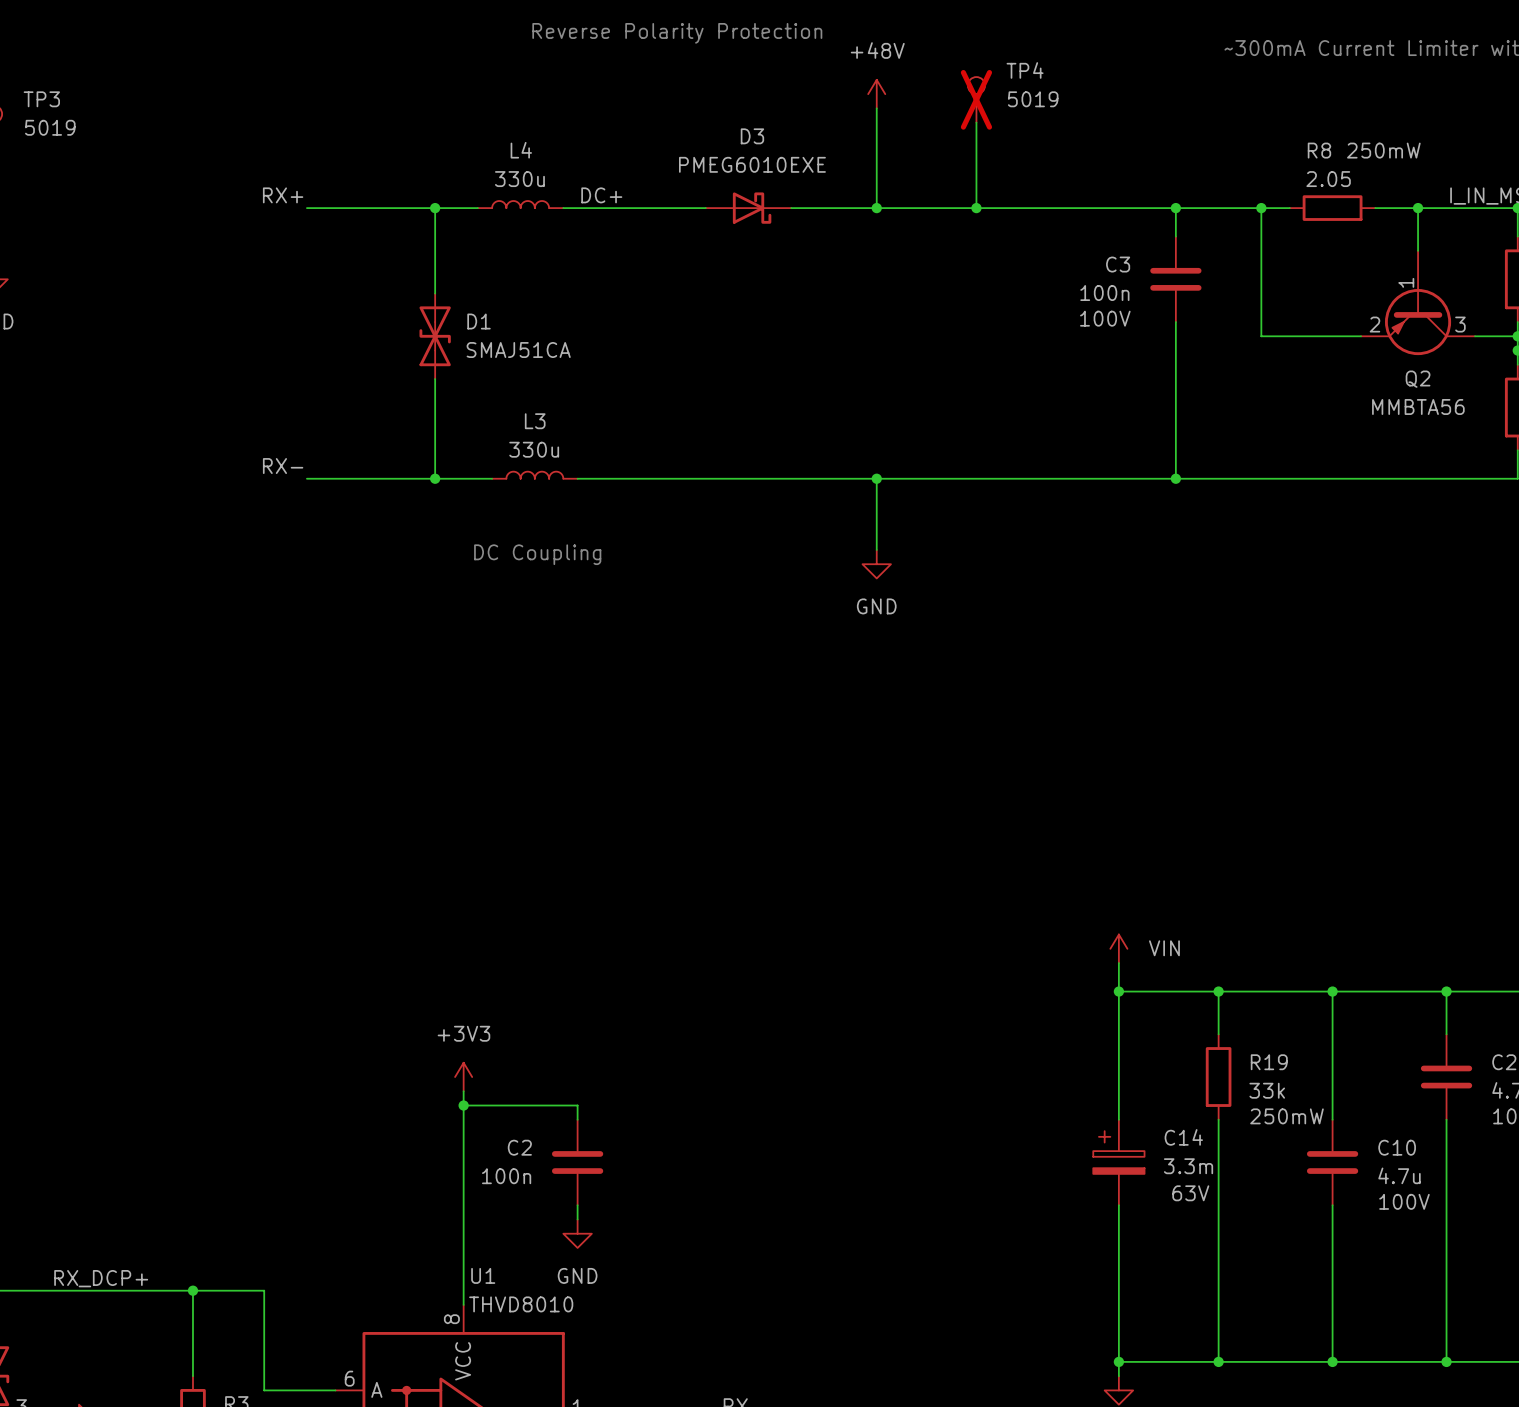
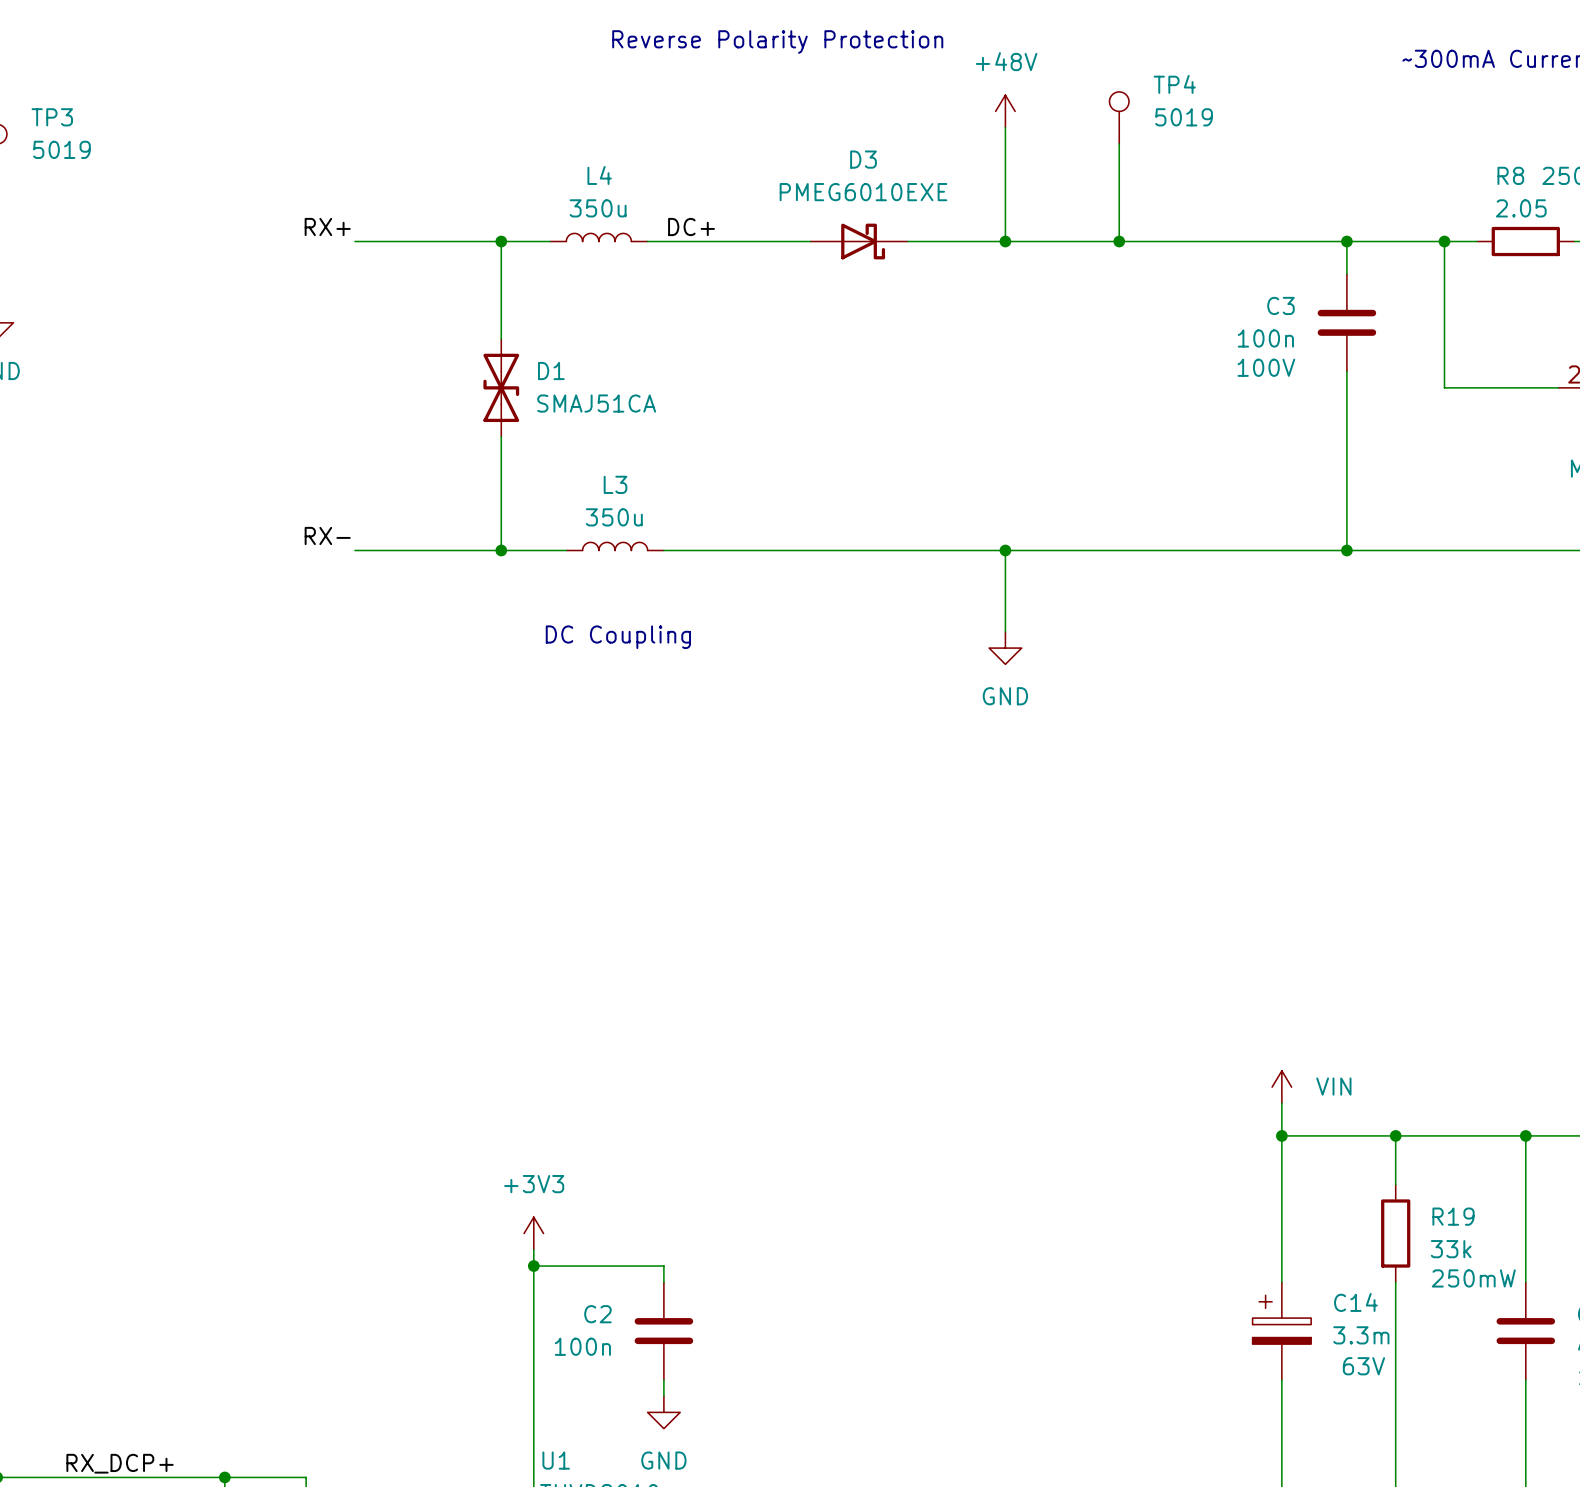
TP4 do-not-place cross: (976, 99) -> none
L4 value: 330u (519, 179) -> 350u (598, 208)
L3 value: 330u (534, 449) -> 350u (614, 517)

